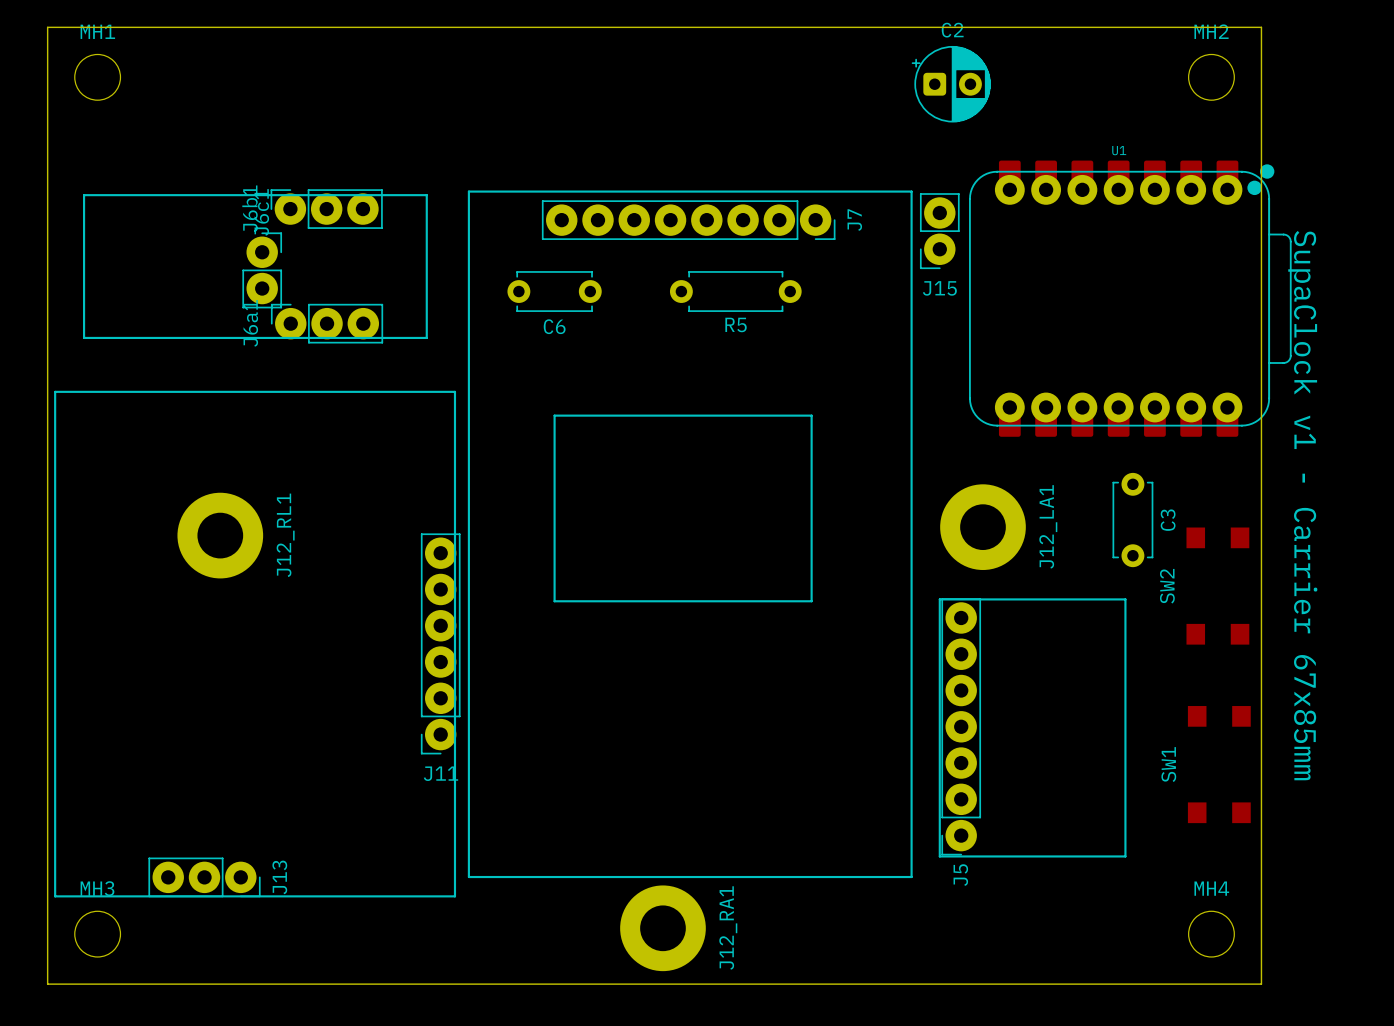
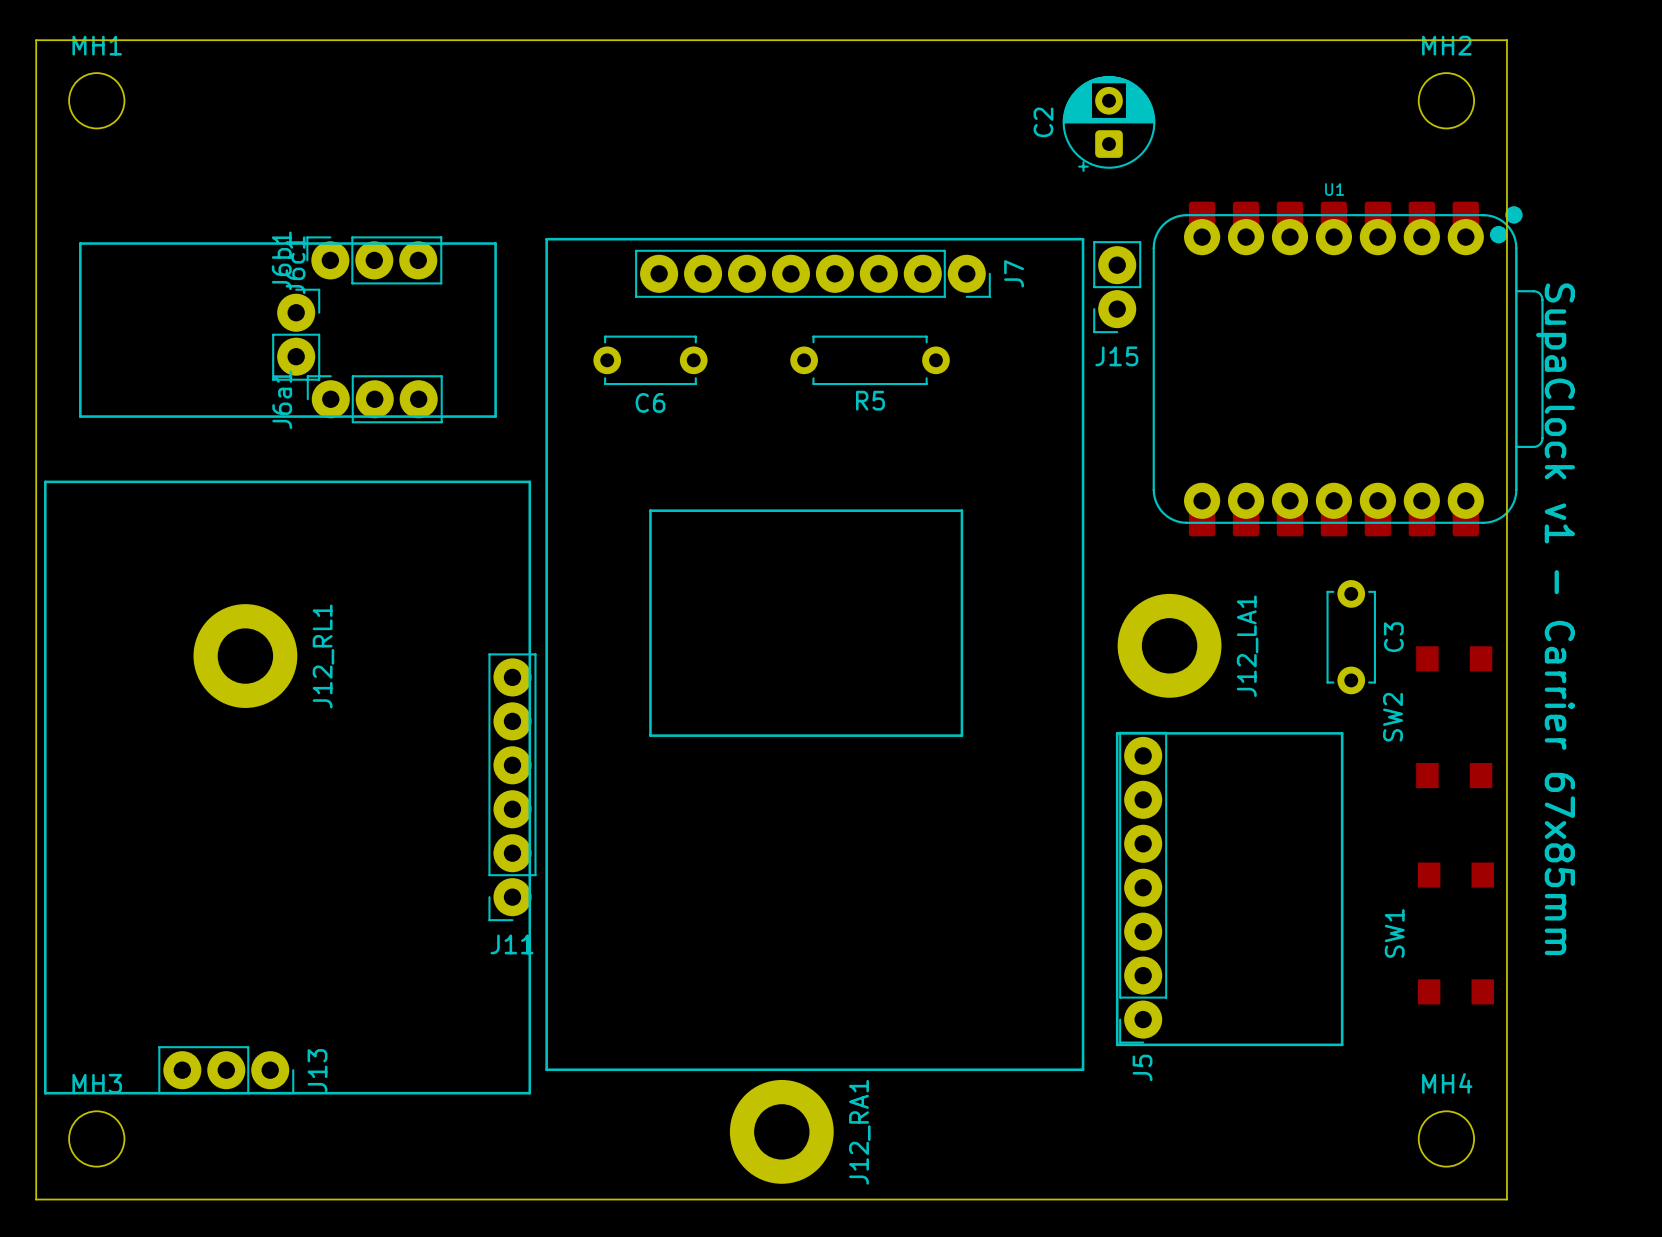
C2 rotation: 0° (951, 84) -> 90° counterclockwise (1109, 124)

